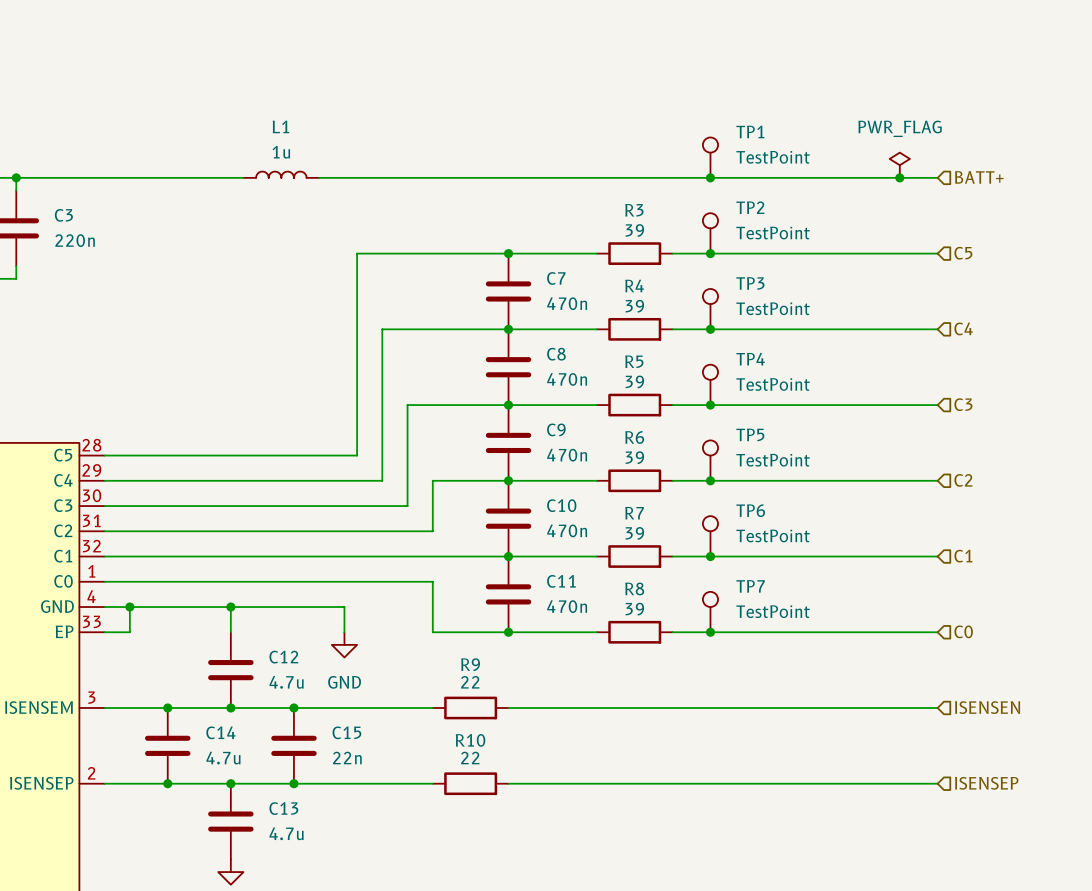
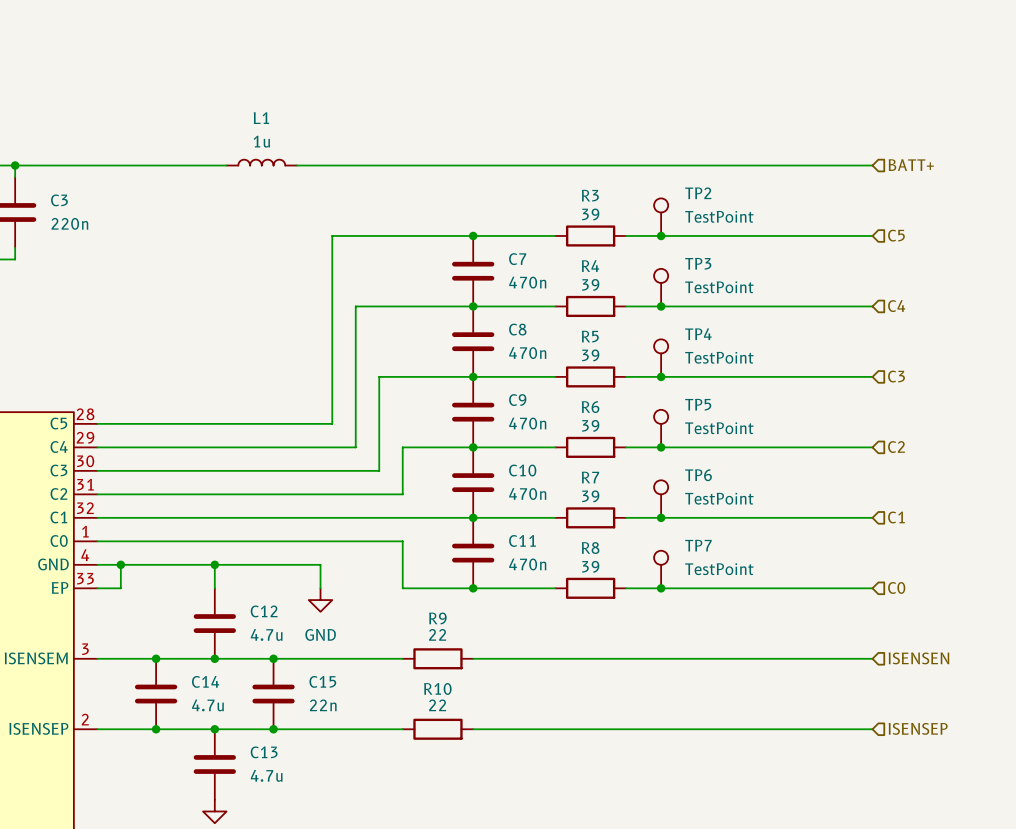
TP1: TestPoint (710, 157) -> none
power symbol: PWR_FLAG (899, 165) -> none
junction: (710, 177) -> none
junction: (899, 177) -> none

